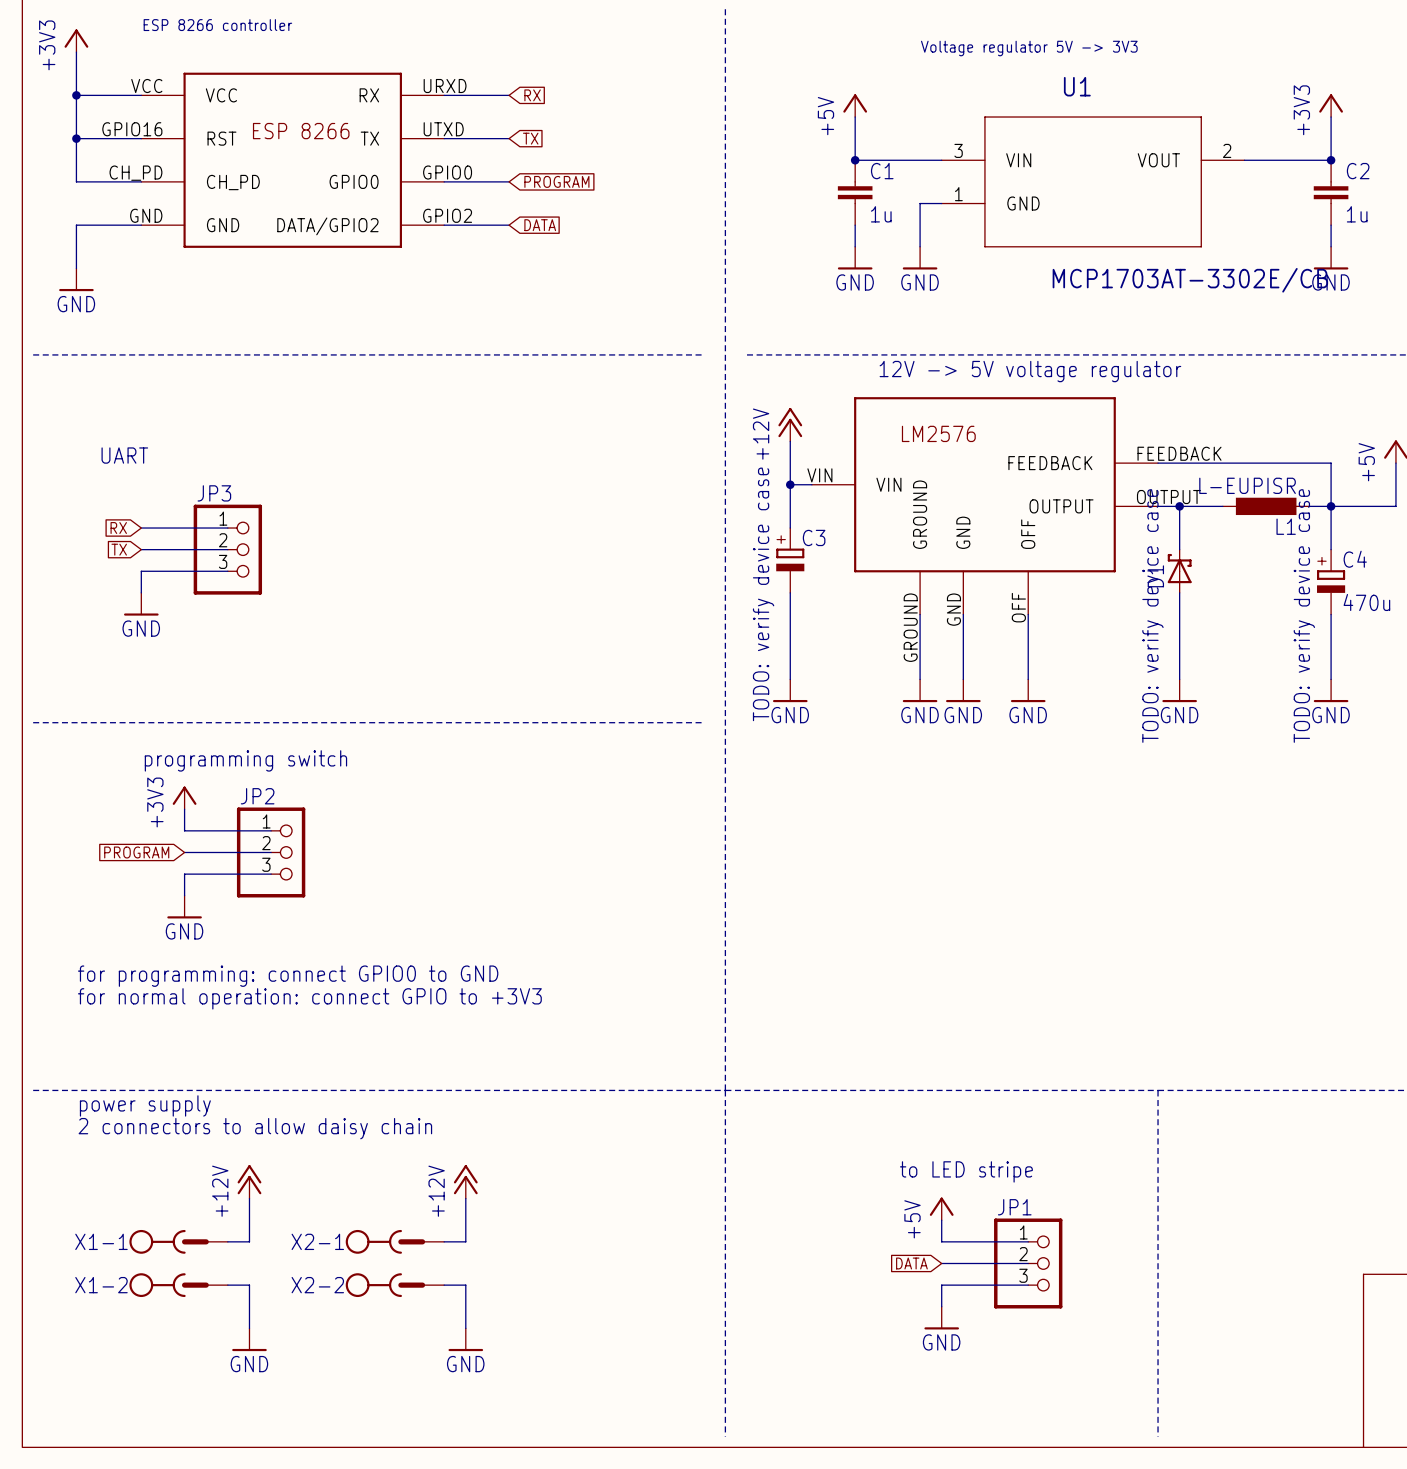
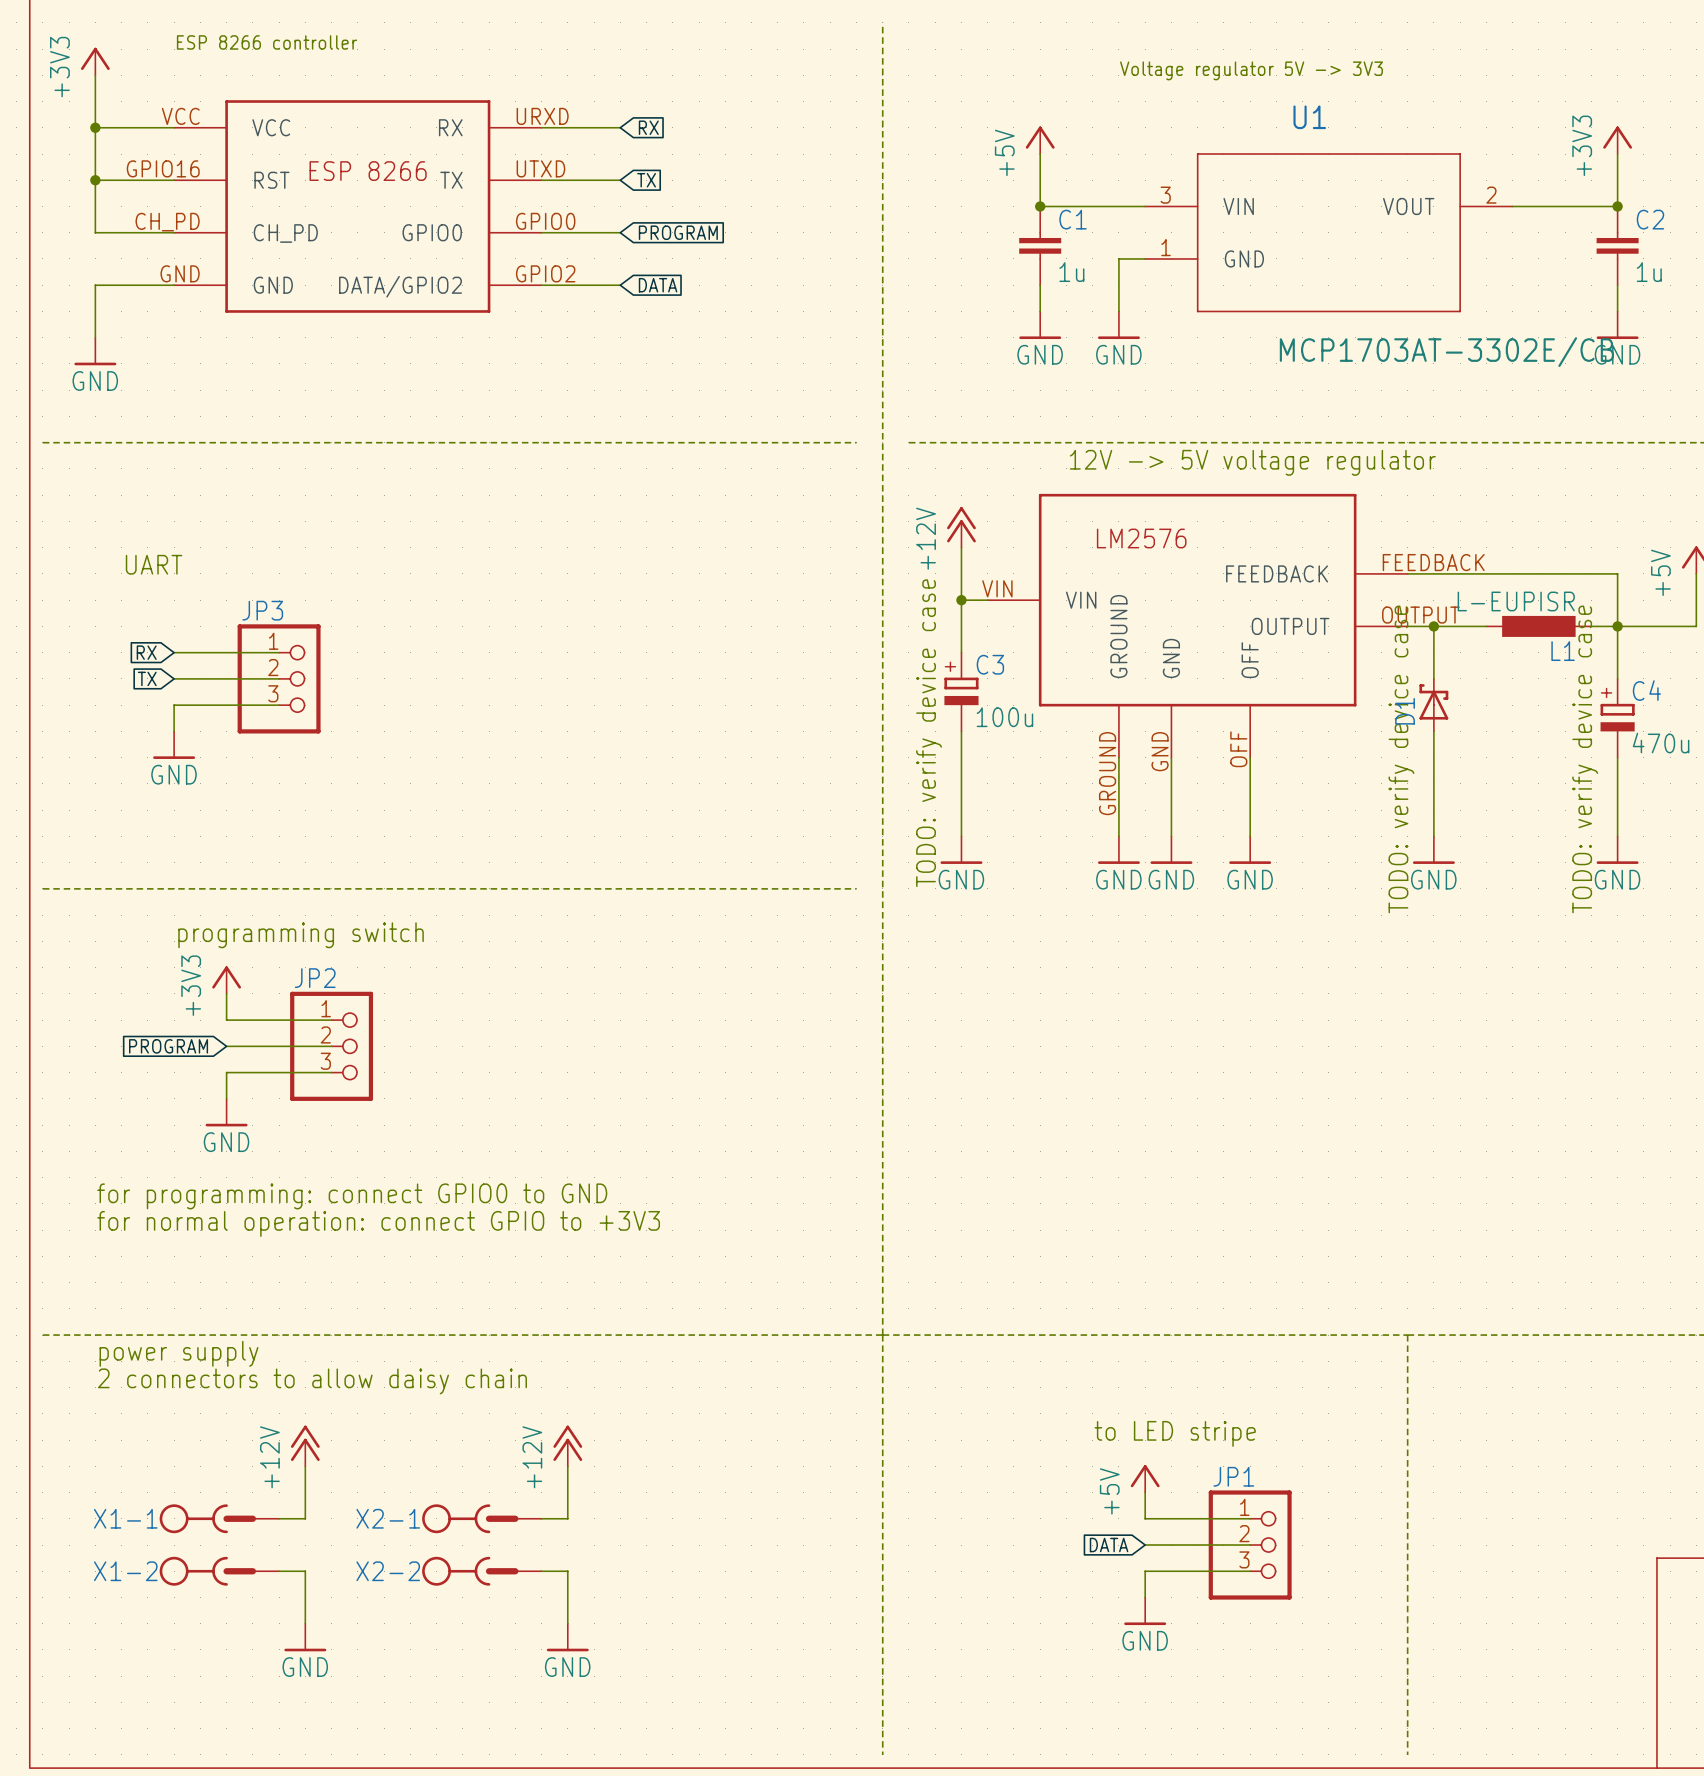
C3 value: none -> 100u (1004, 717)

